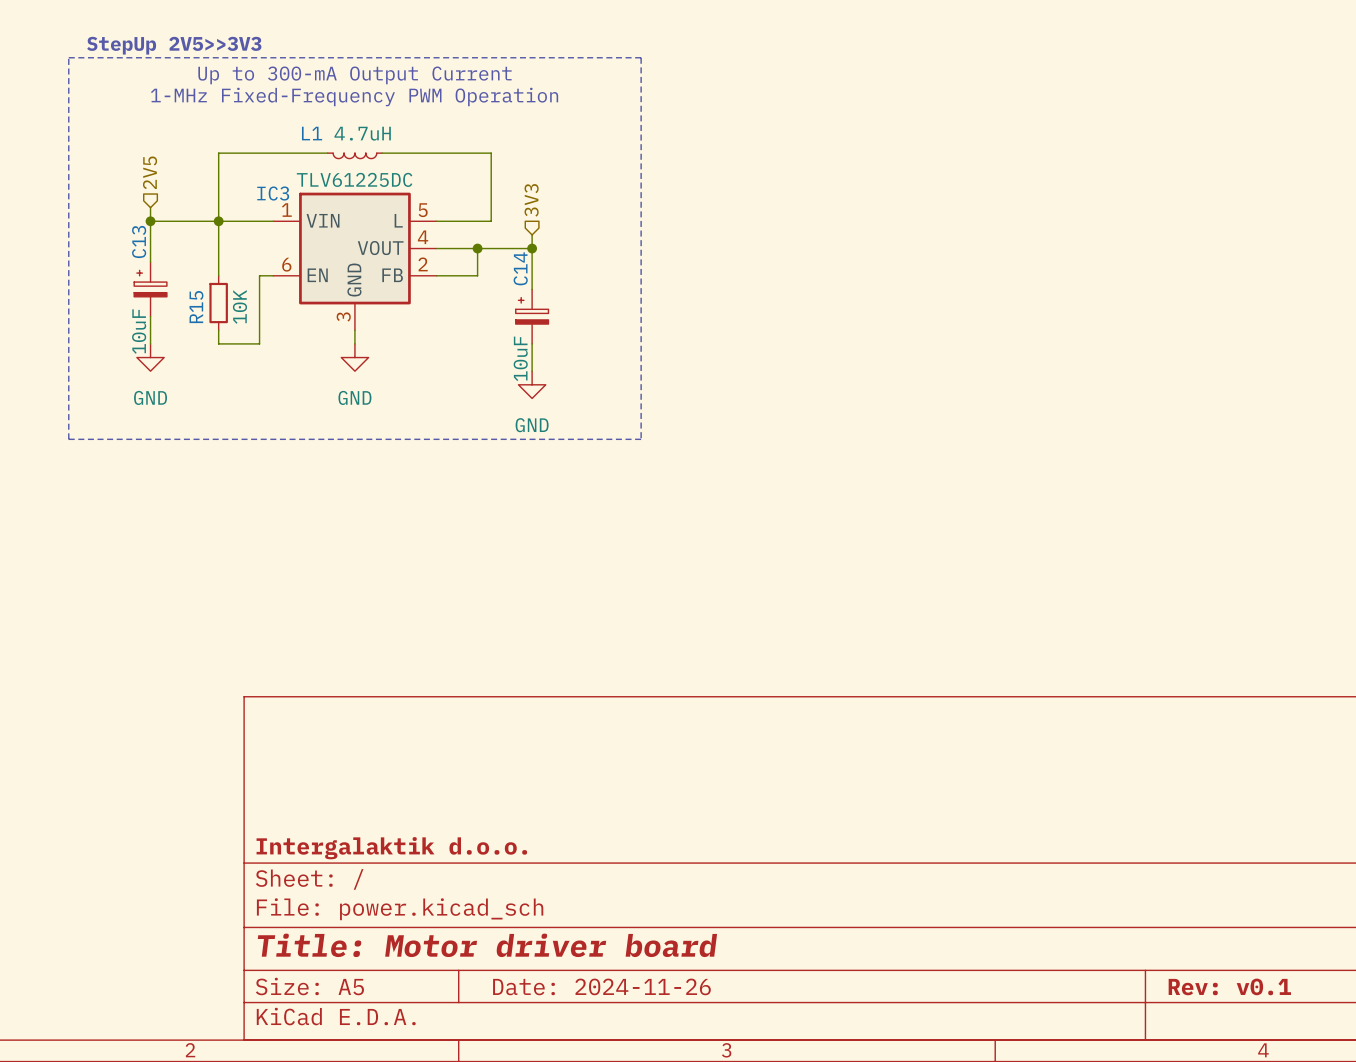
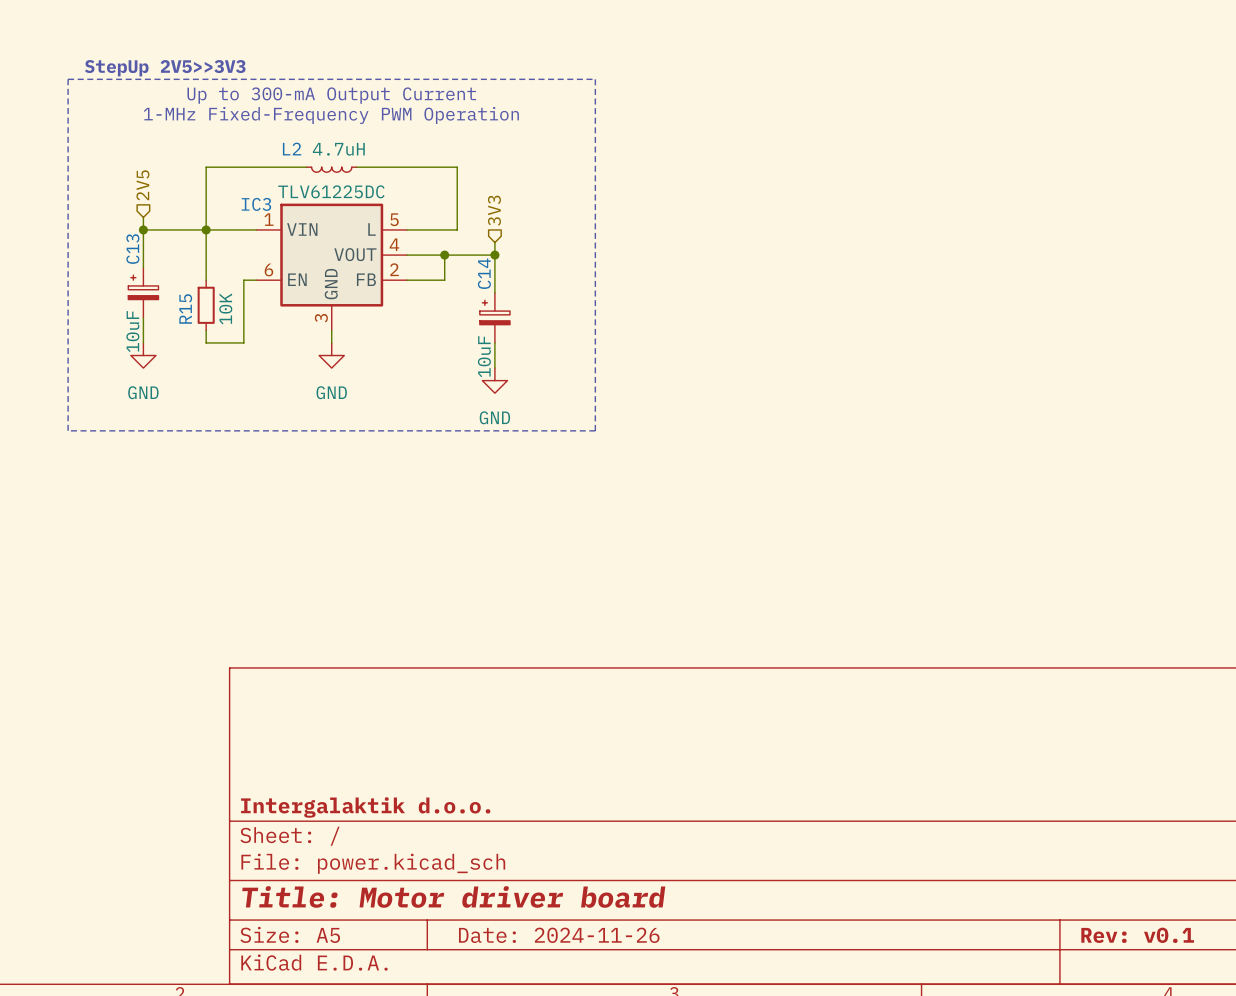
L1 name: L1 (312, 133) -> L2 (292, 149)

